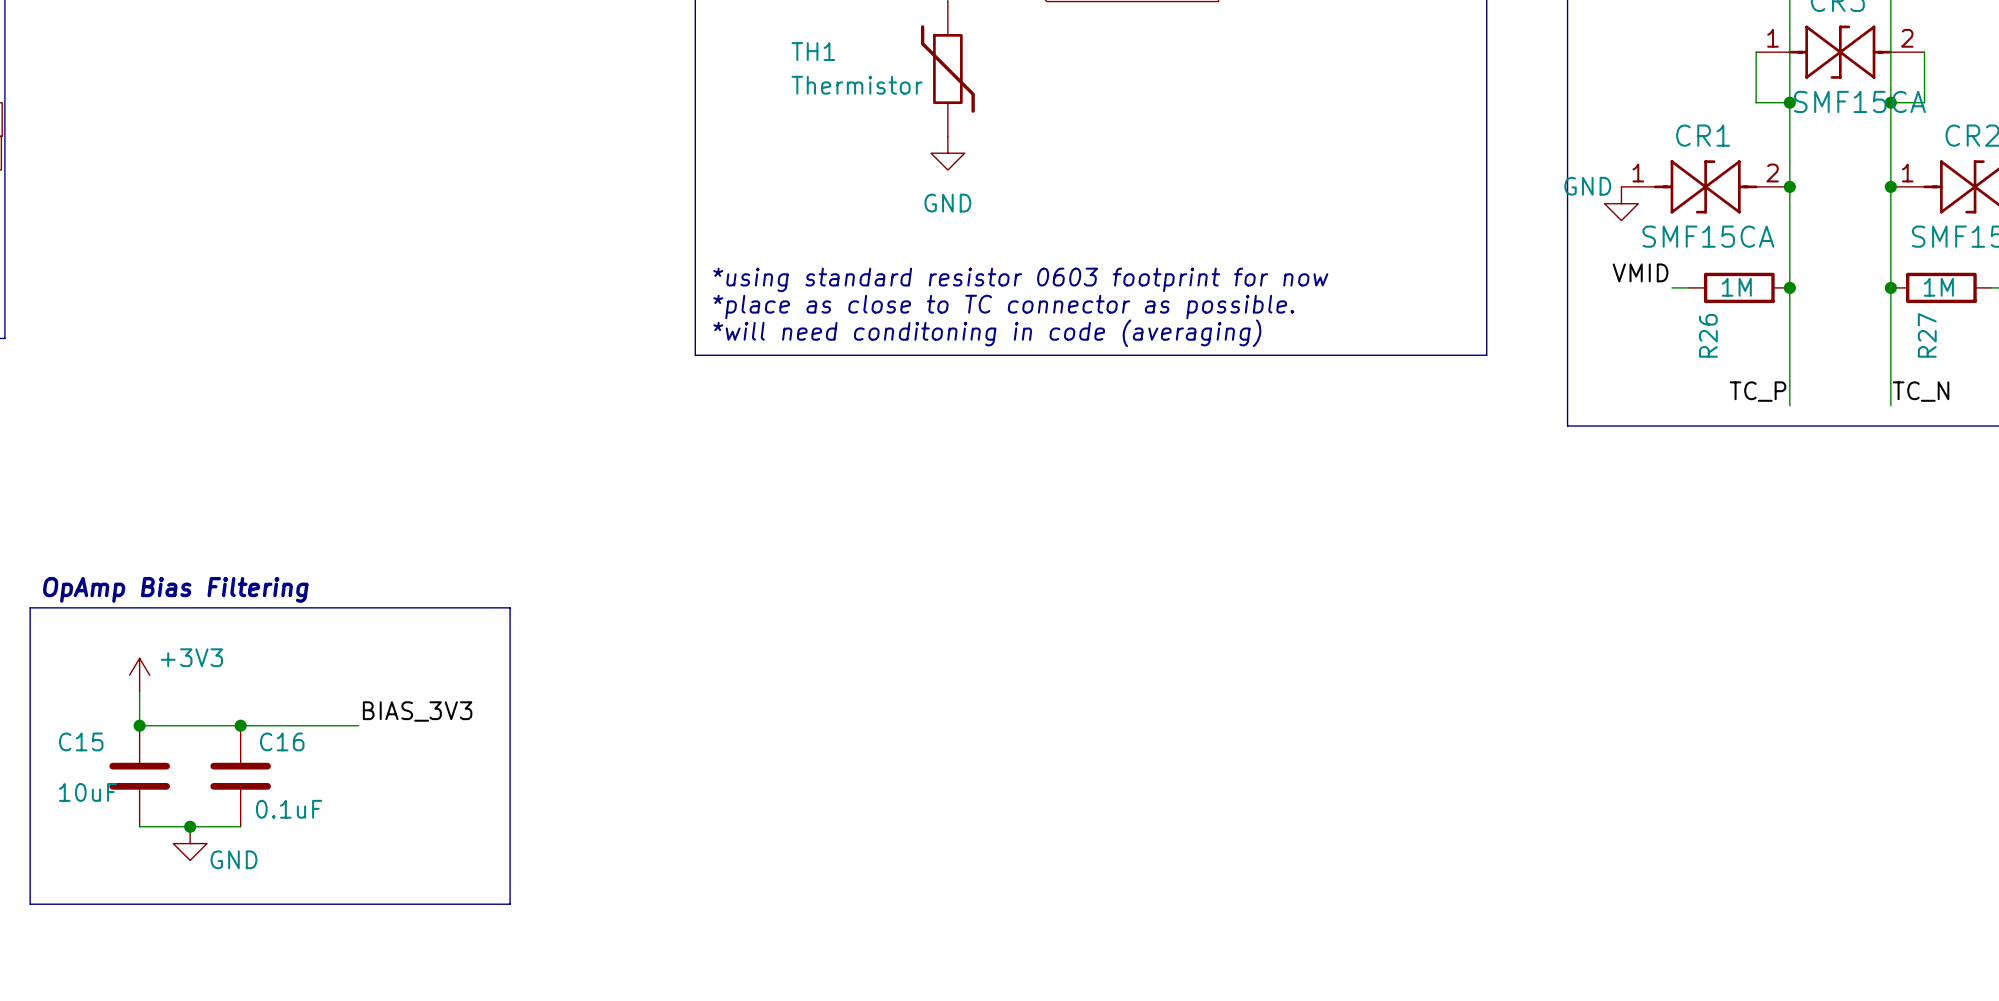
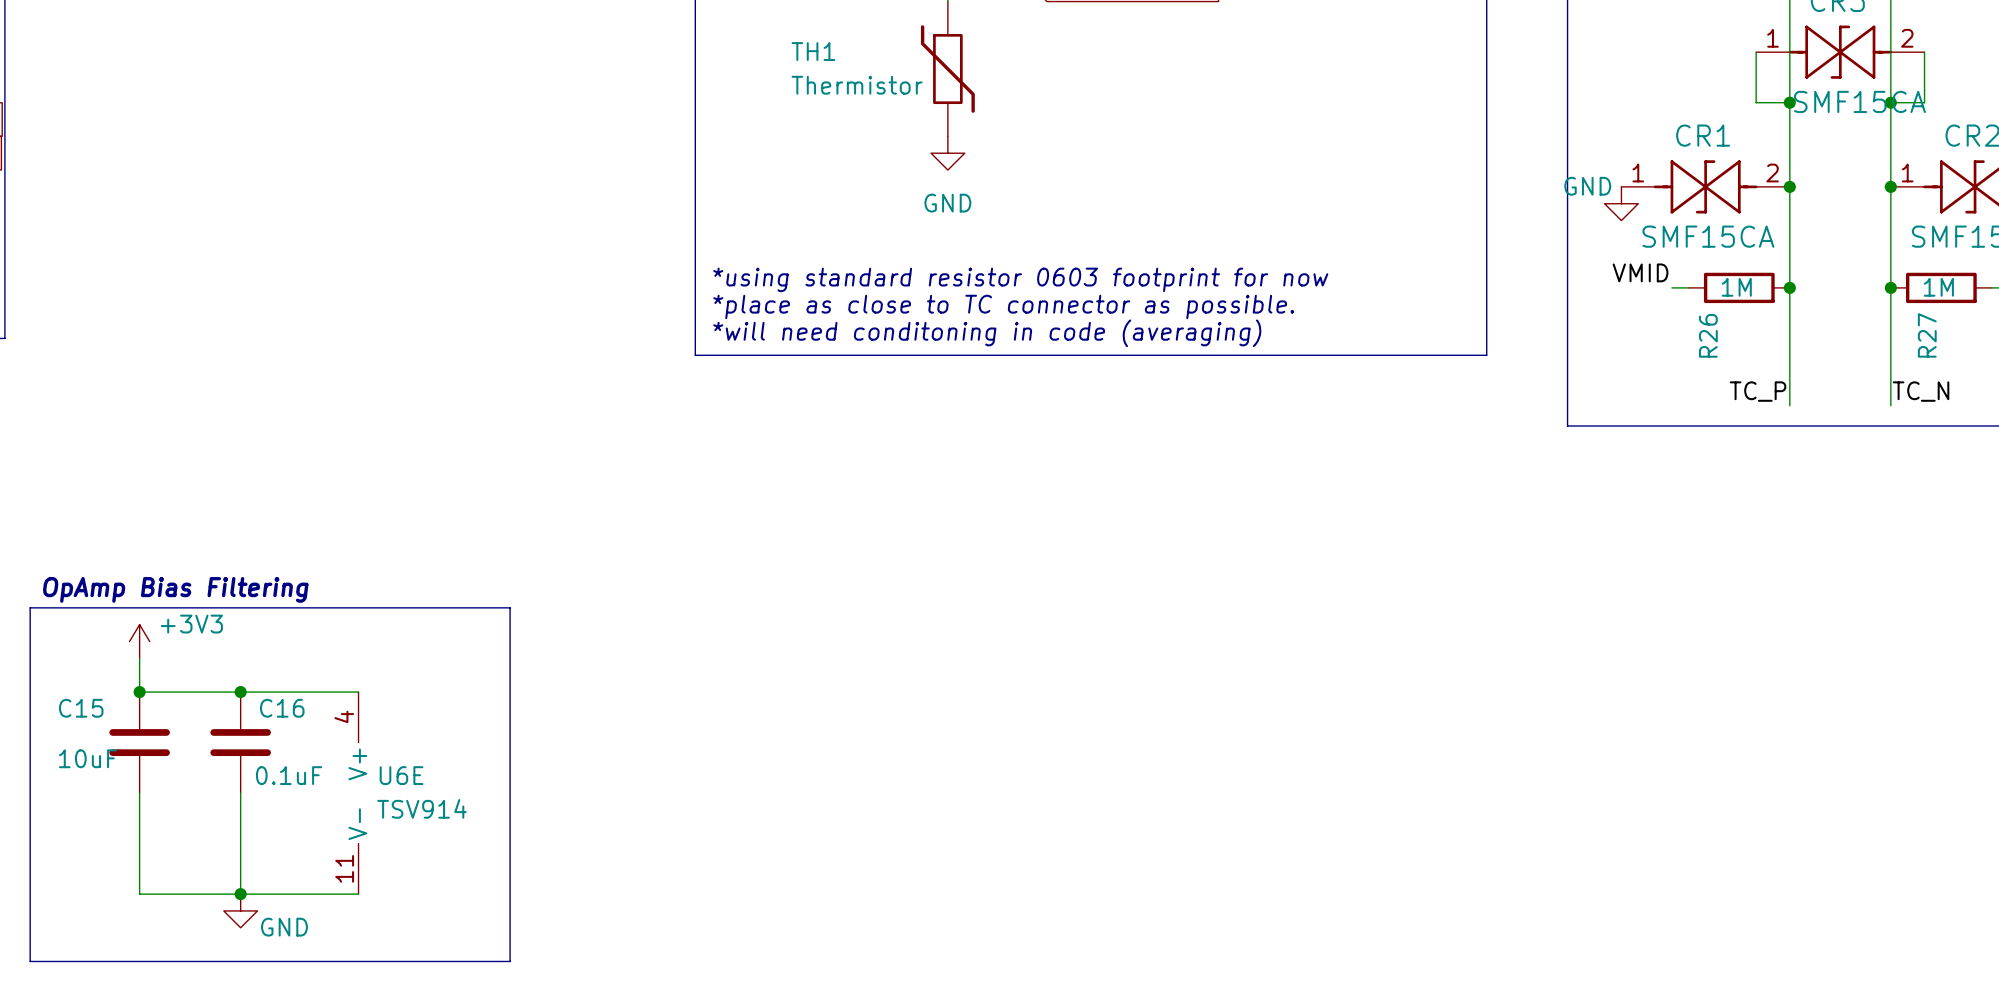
power symbol position: +3V3 (139, 675) -> +3V3 (139, 641)
wire: (139, 692) (139, 725) (358, 725) -> (139, 658) (139, 692) (358, 692)
label: BIAS_3V3 (417, 711) -> none
junction position: (139, 725) -> (139, 692)
junction position: (240, 725) -> (240, 692)
C15 position: (139, 776) -> (139, 742)
C16 position: (240, 776) -> (240, 742)
wire: none -> (139, 793) (139, 894) (358, 894)
wire: none -> (240, 793) (240, 894)
U6E: none -> TSV914 (358, 793)
wire: (139, 826) (240, 826) -> none
junction: (190, 826) -> none
power symbol position: GND (190, 843) -> GND (240, 910)
junction: none -> (240, 894)
line: (30, 904) (510, 904) -> (30, 904) (30, 961) (510, 961) (510, 904)

